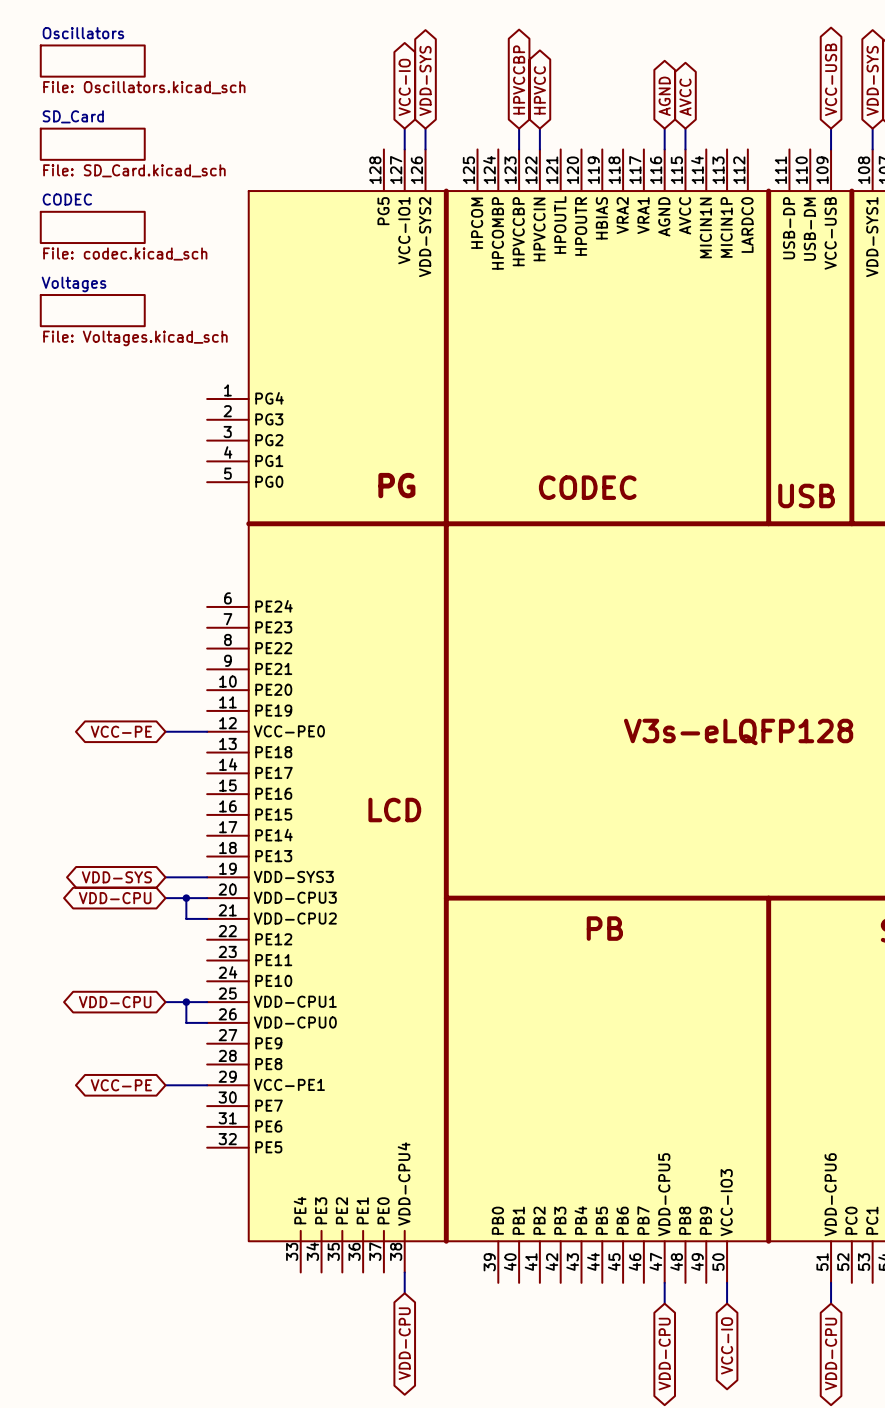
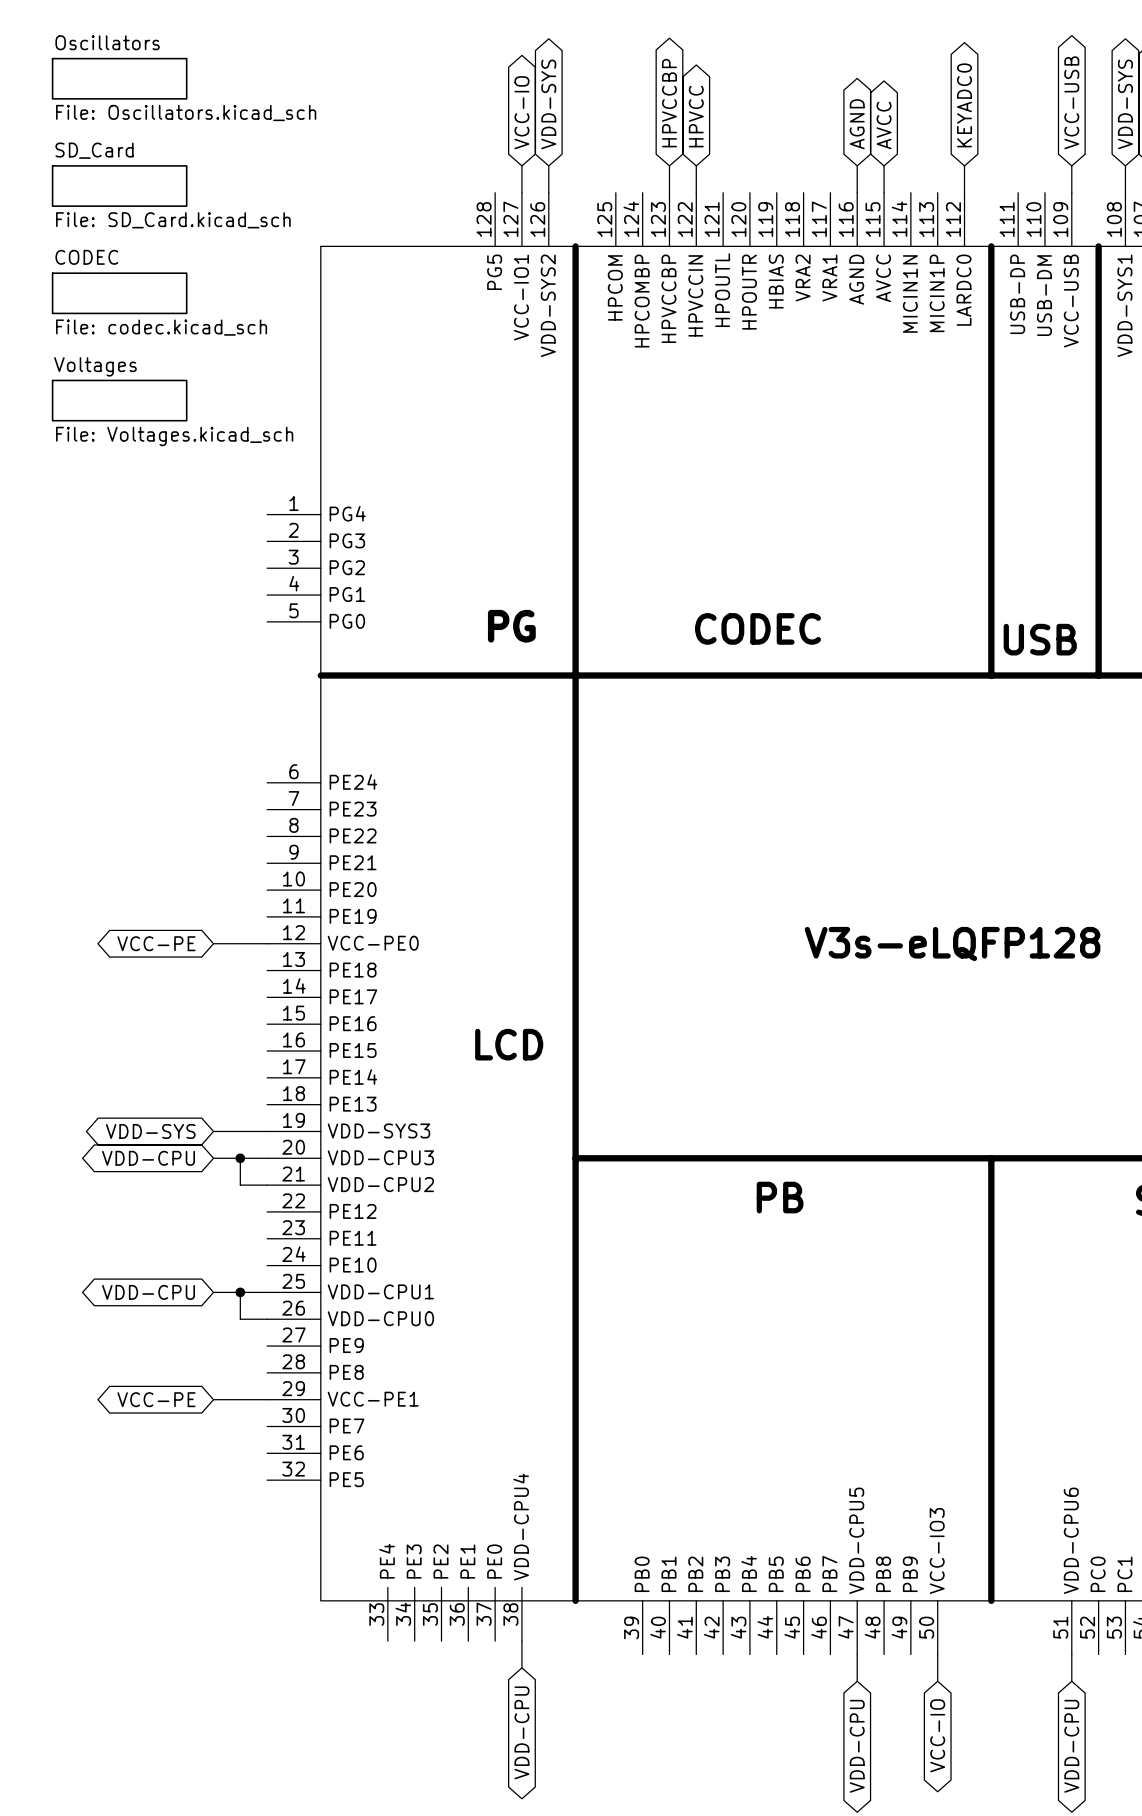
global label: none -> KEYADC0 (964, 105)
wire: none -> (964, 165) (964, 192)

